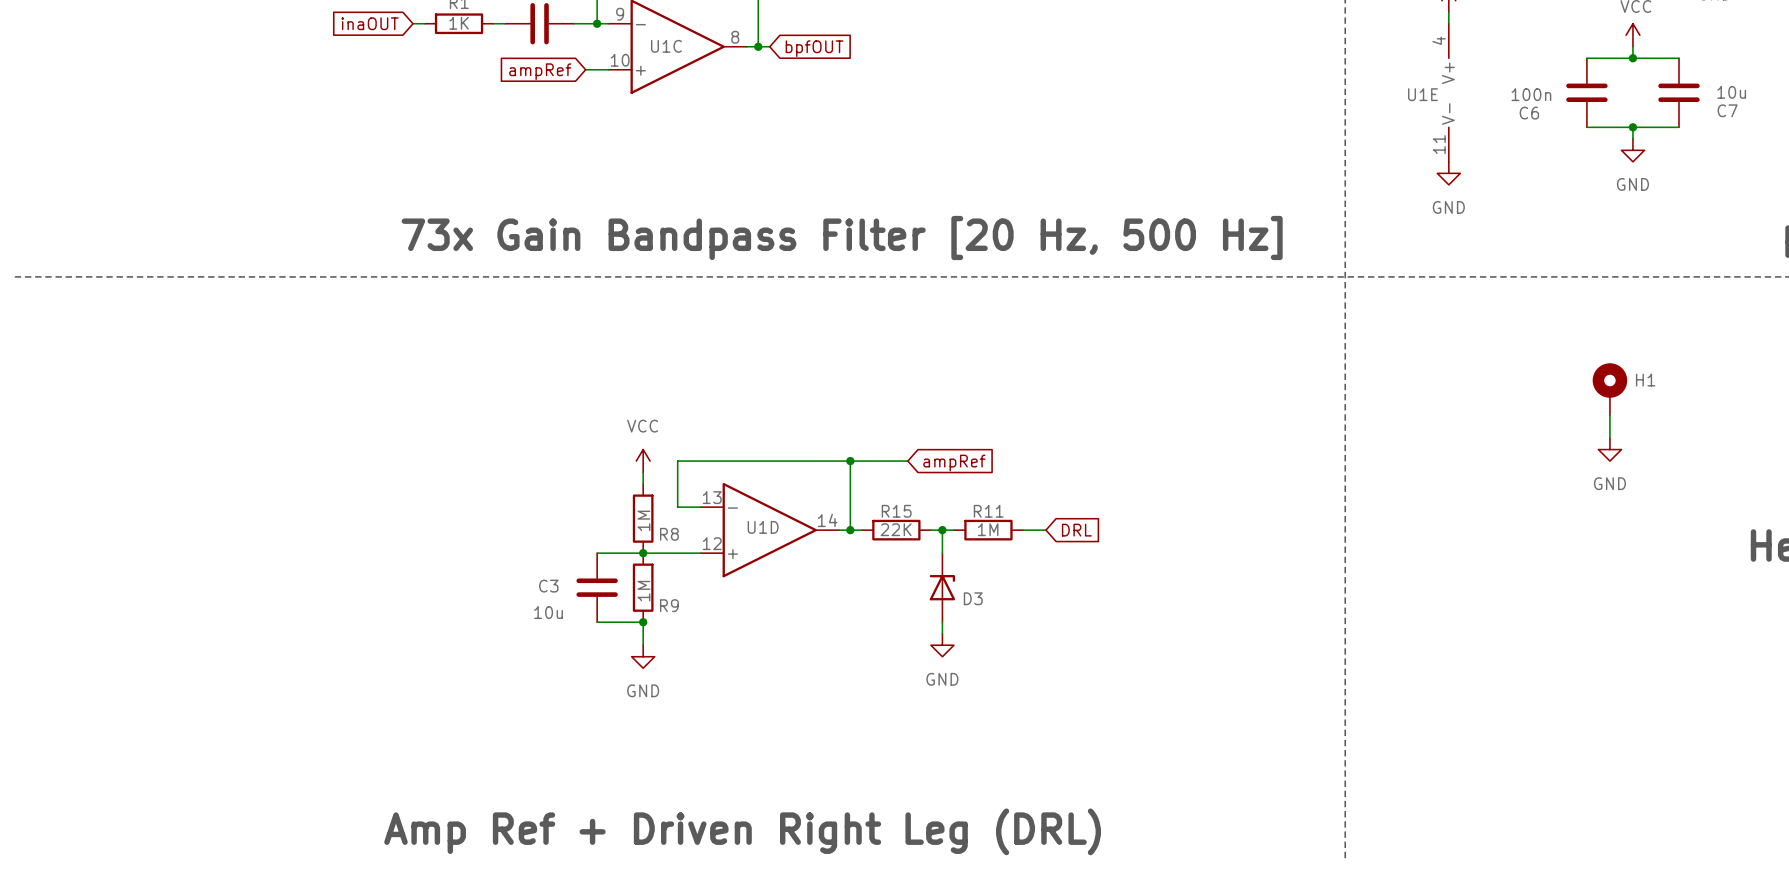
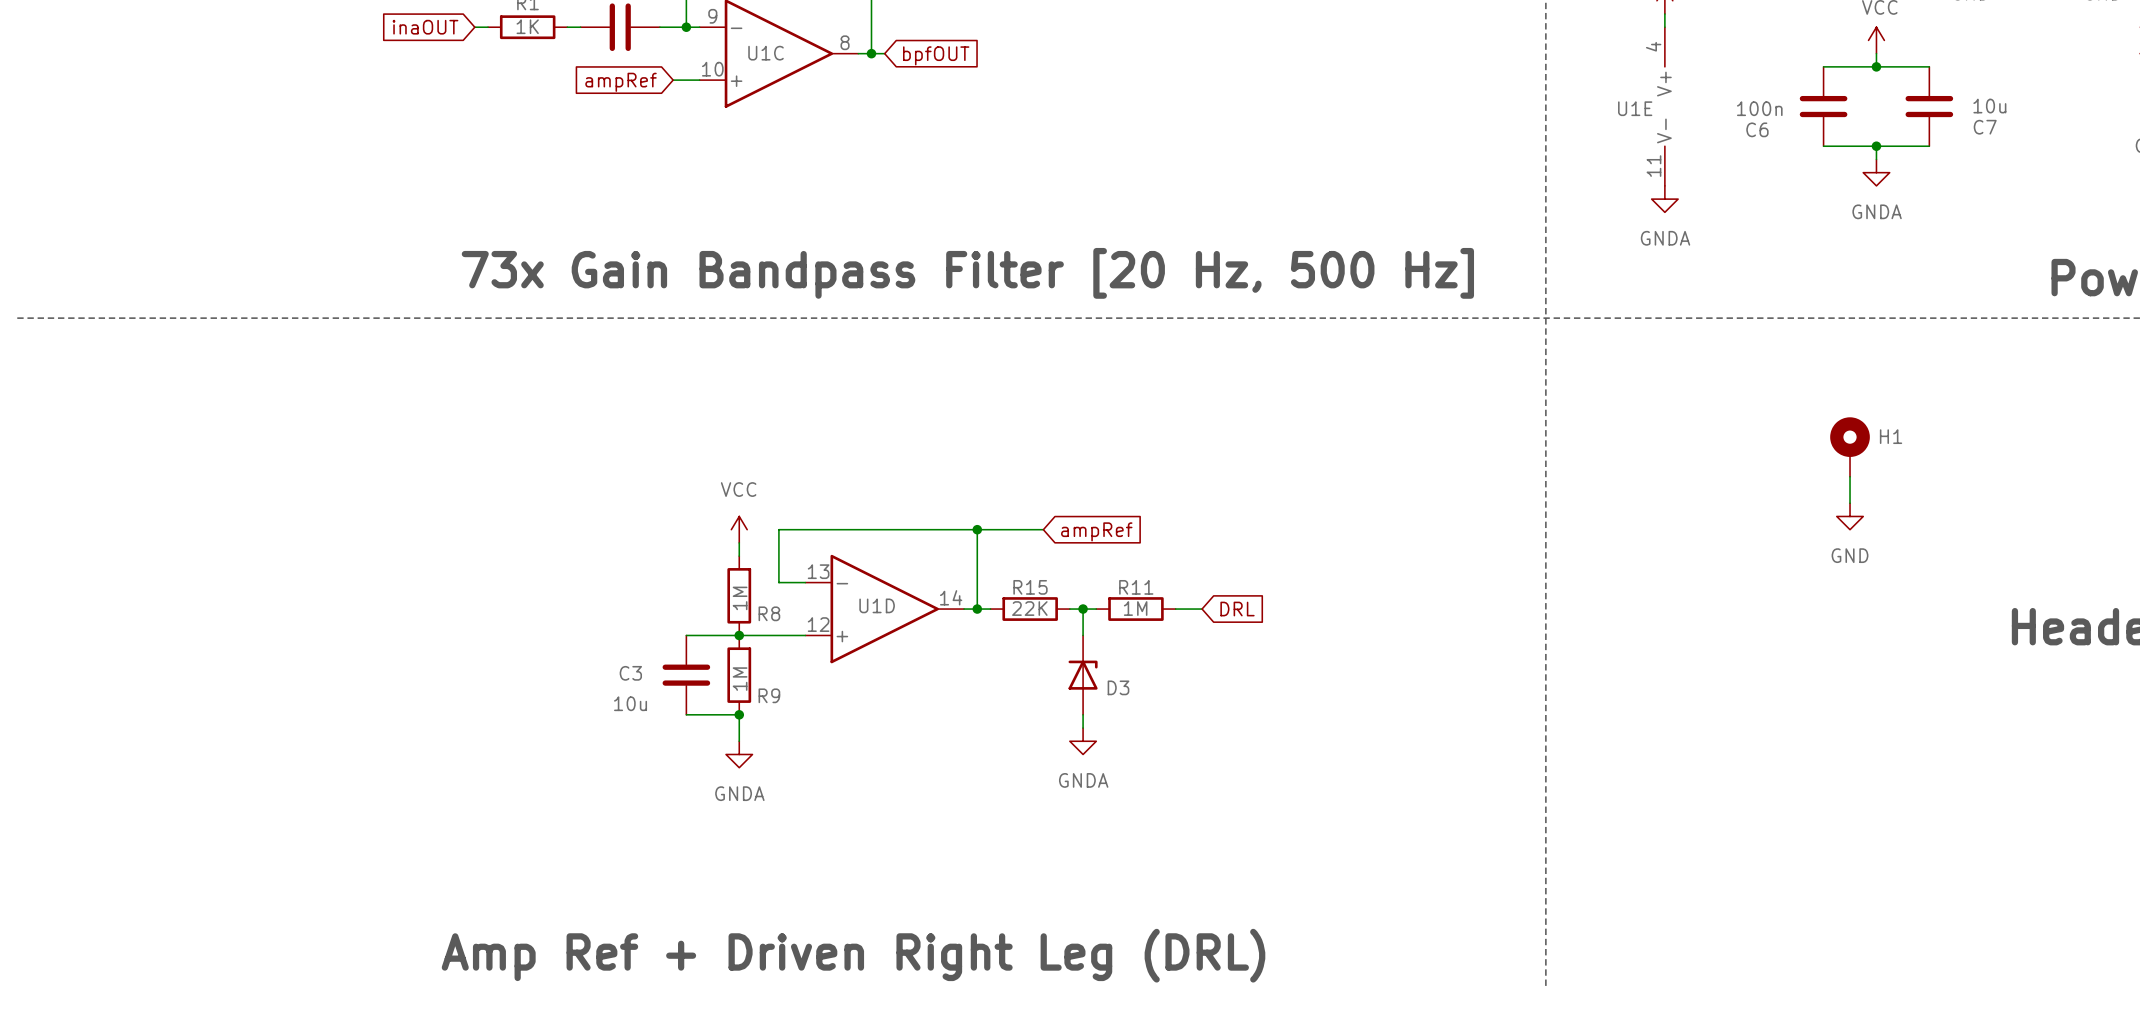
power symbol: GND (1632, 150) -> GNDA (1876, 172)
power symbol: GND (1448, 173) -> GNDA (1664, 199)
power symbol: GND (942, 645) -> GNDA (1083, 741)
power symbol: GND (643, 656) -> GNDA (739, 754)

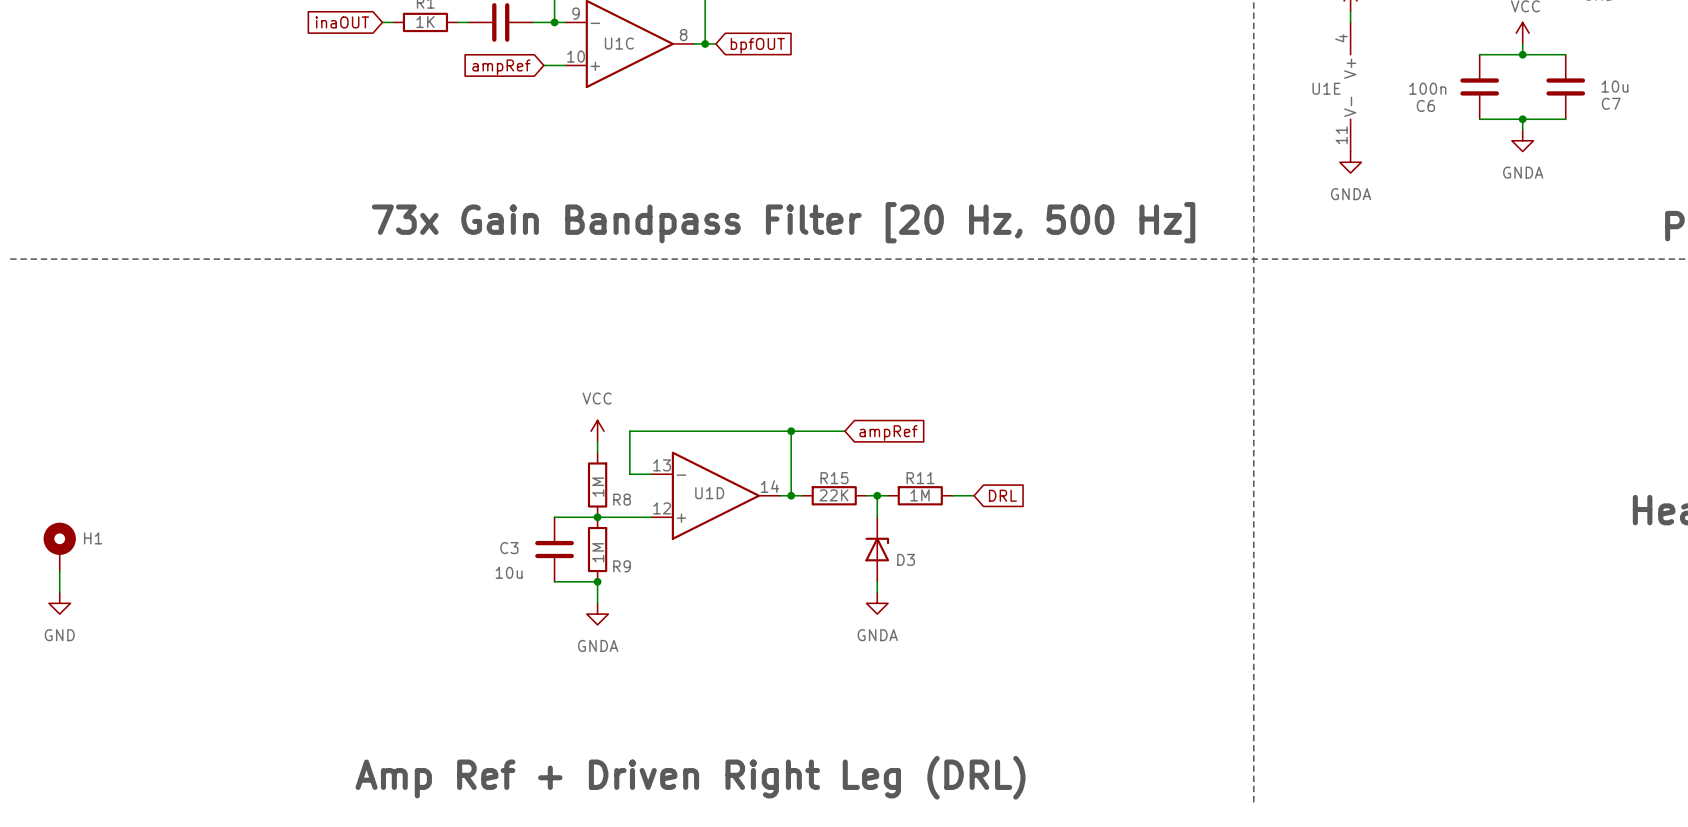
H1 position: (1850, 447) -> (59, 546)
wire: (1850, 476) (1850, 503) -> none
power symbol: GND (1850, 516) -> none
wire: none -> (59, 571) (59, 592)
power symbol: none -> GND (59, 603)

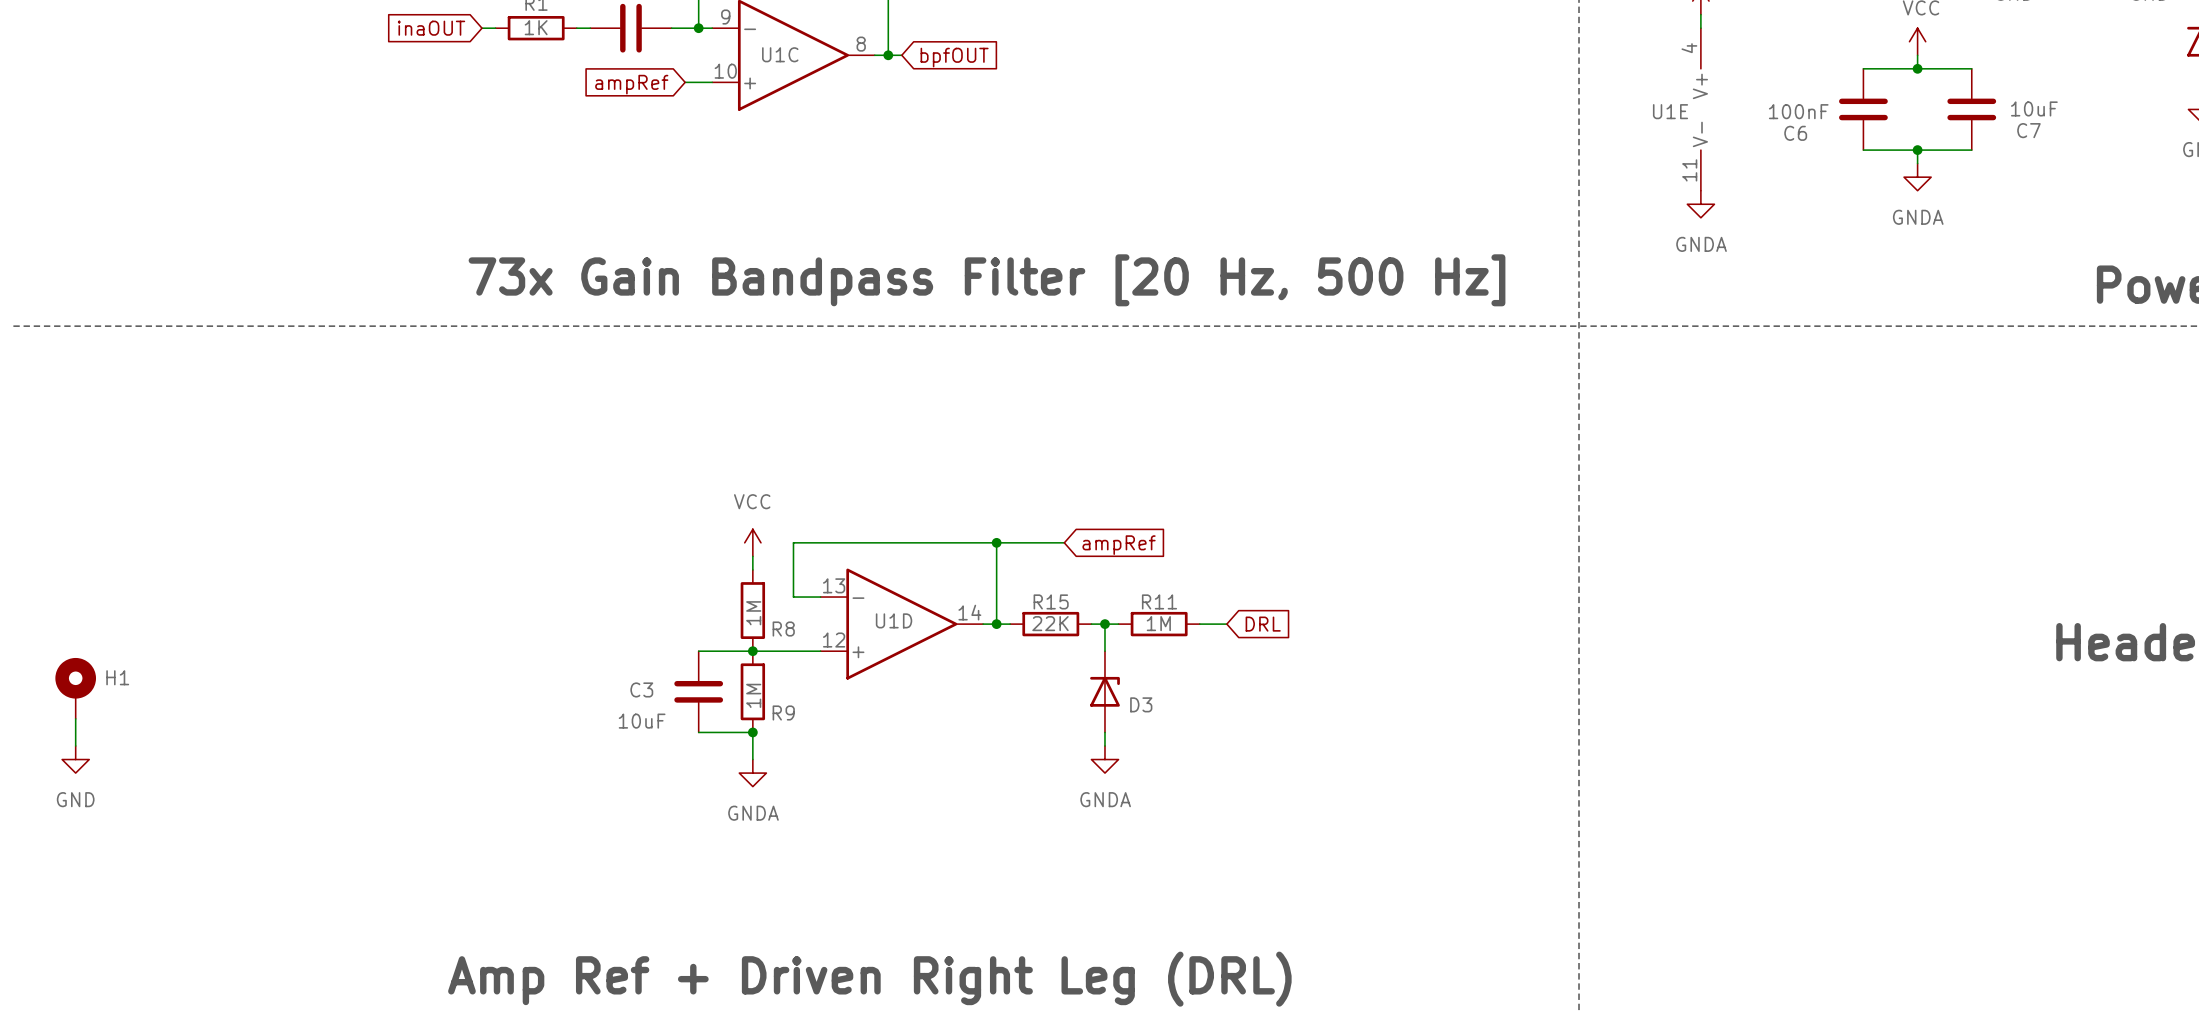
C7 value: 10u (1614, 86) -> 10uF (2034, 108)
C6 value: 100n (1427, 88) -> 100nF (1798, 111)
C3 value: 10u (509, 572) -> 10uF (642, 721)

